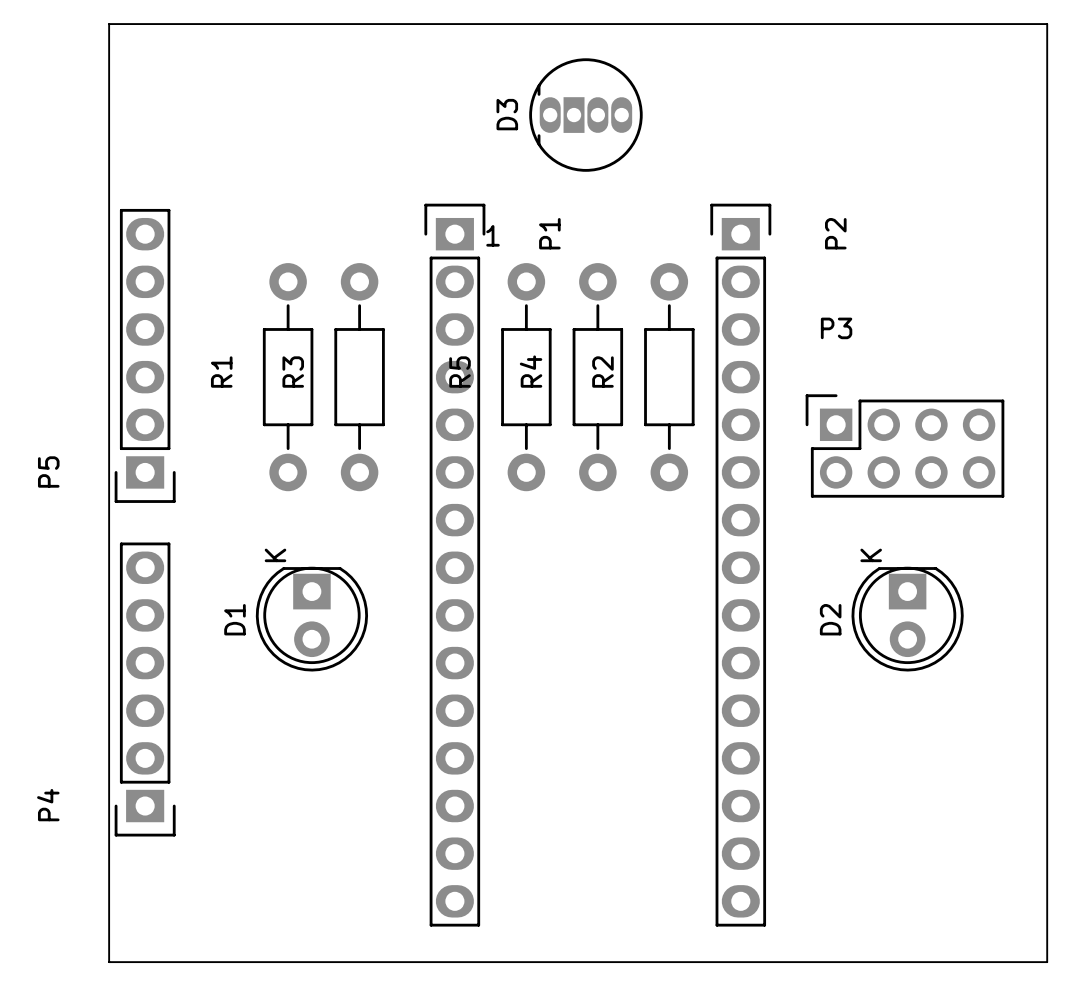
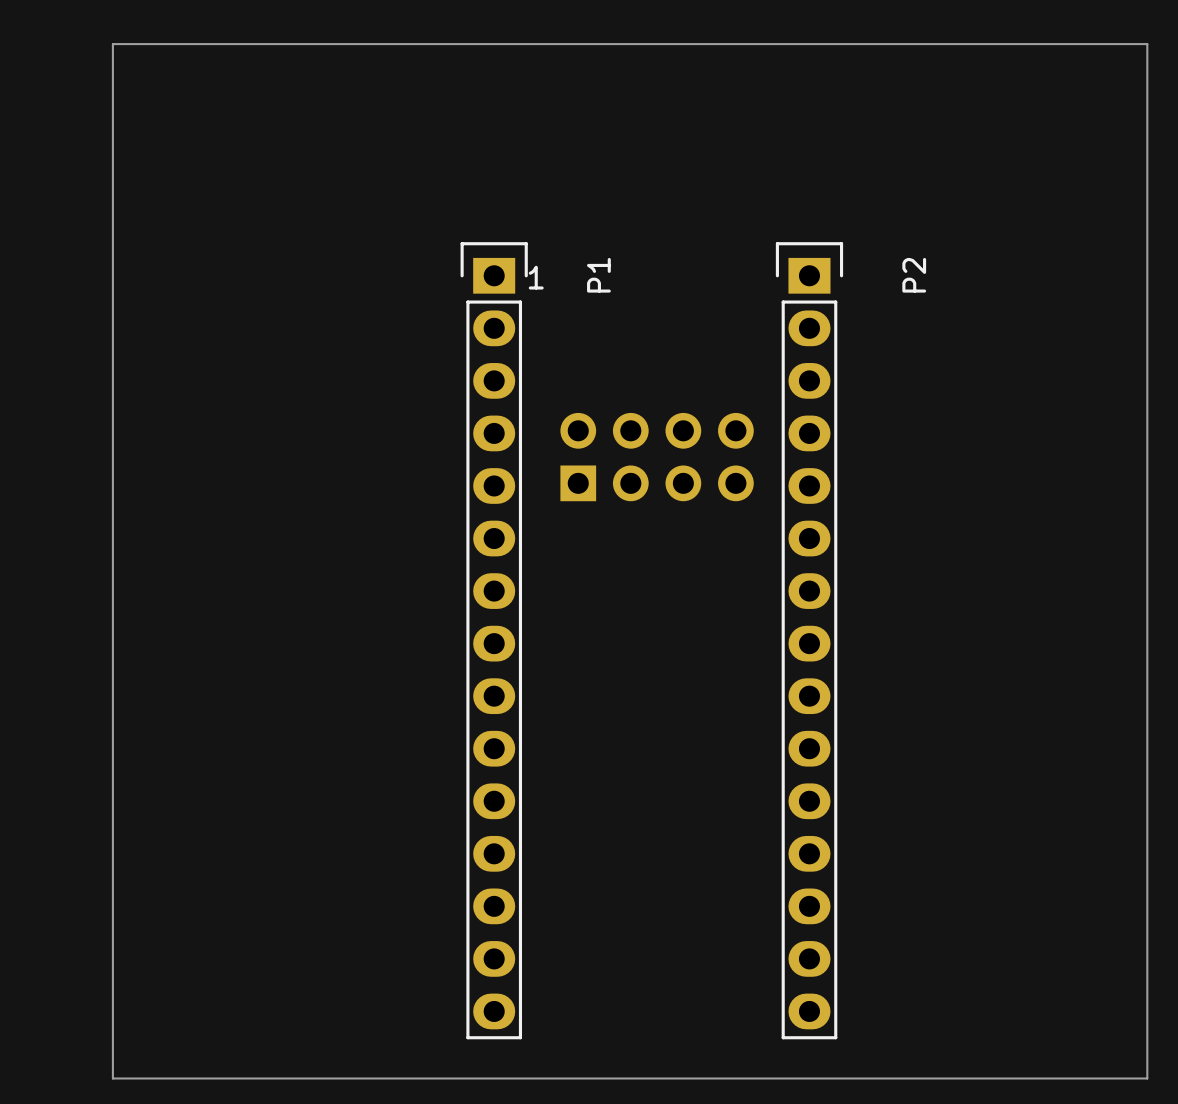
D3: (585, 115) -> none
P5: (145, 355) -> none
R1: (288, 377) -> none
R3: (359, 377) -> none
R5: (526, 377) -> none
R4: (597, 377) -> none
R2: (669, 377) -> none
P3 side: top (904, 445) -> bottom (657, 457)
D1: (311, 619) -> none
D2: (907, 619) -> none
P4: (145, 689) -> none

